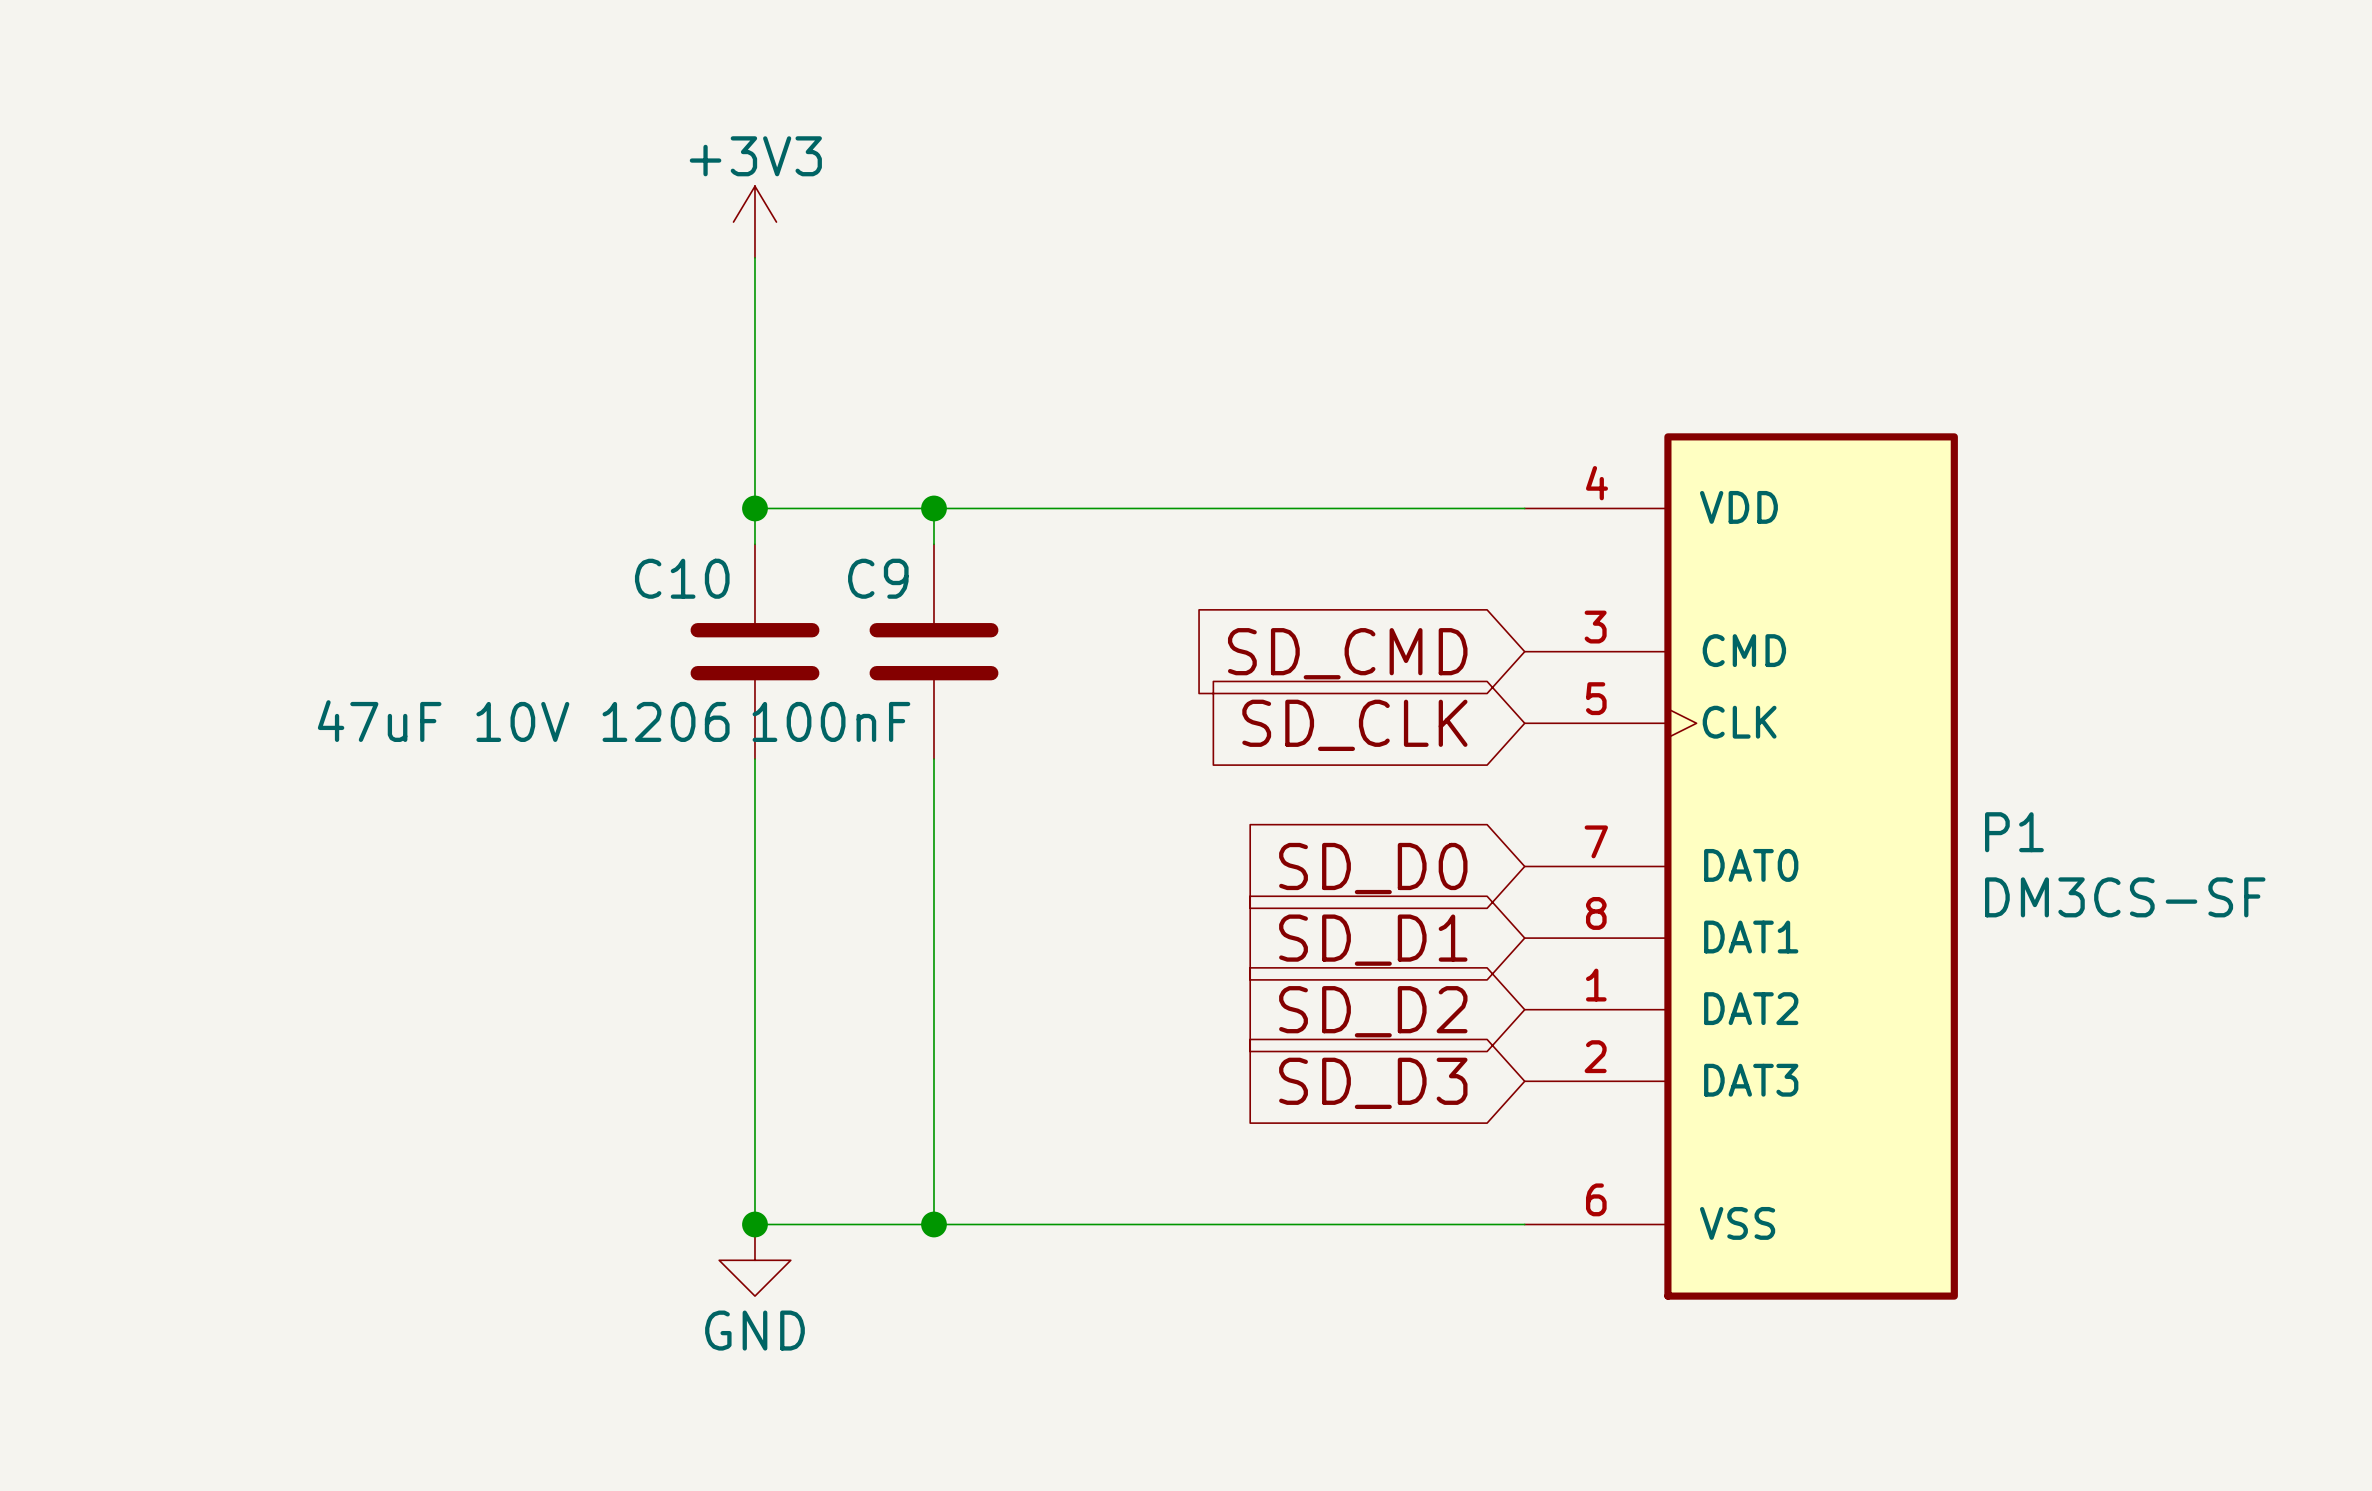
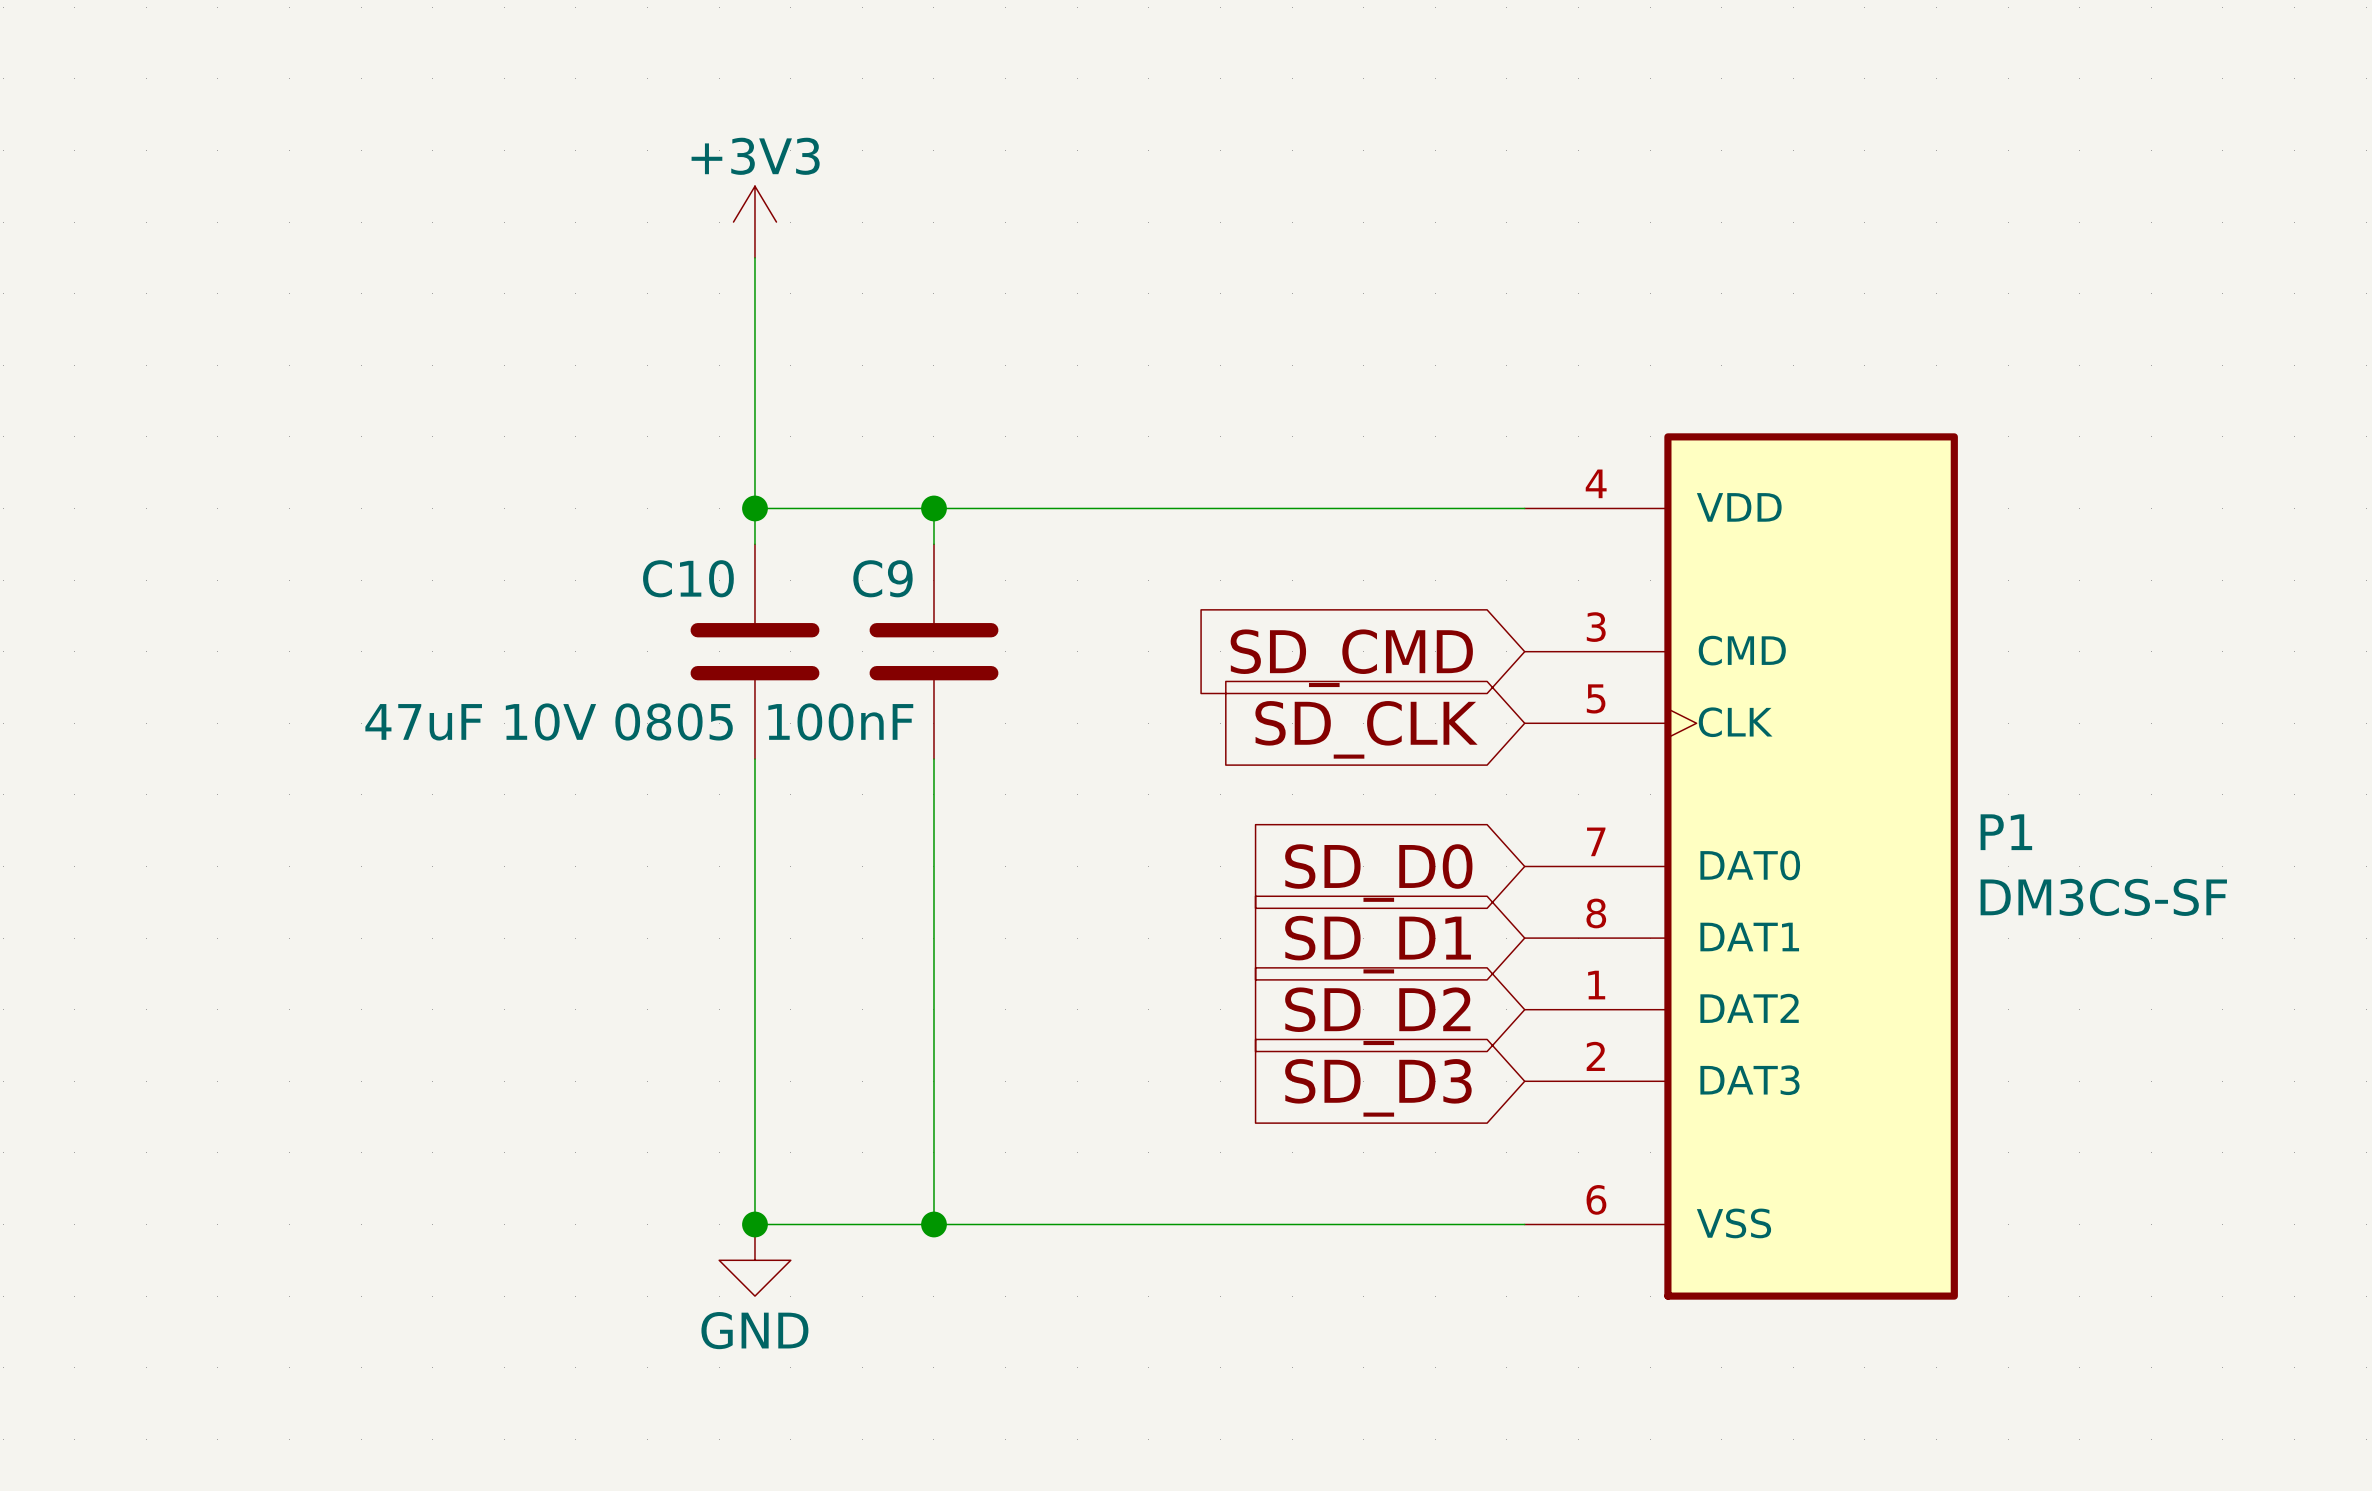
C10 value: 47uF 10V 1206 (523, 721) -> 47uF 10V 0805 (549, 721)

